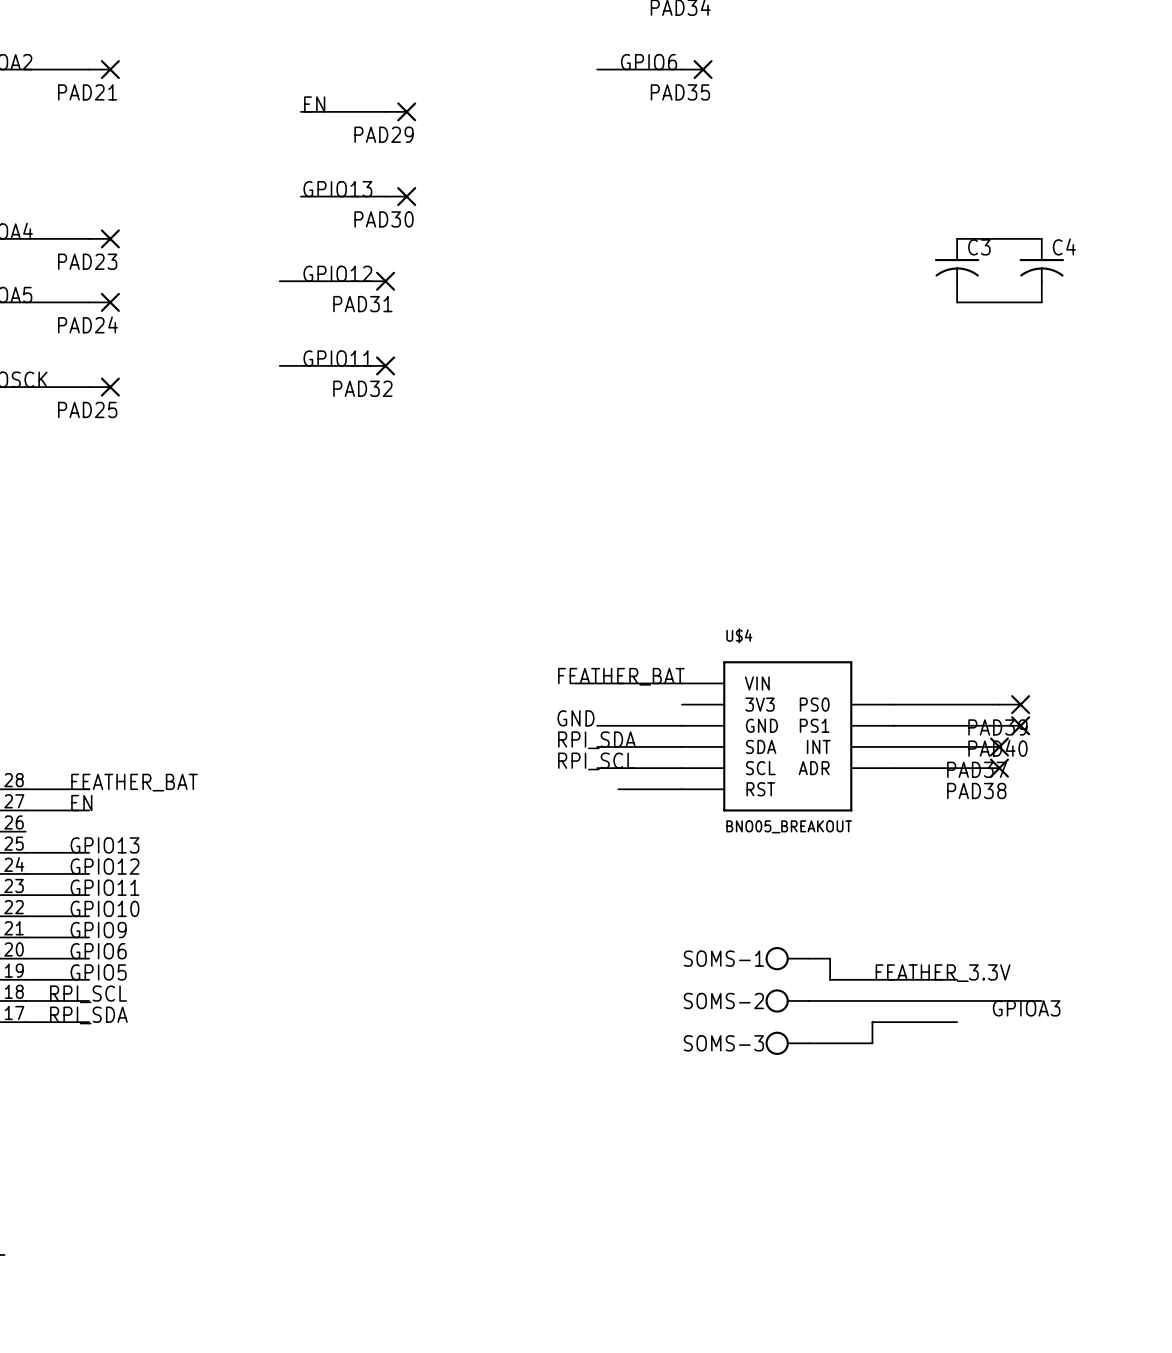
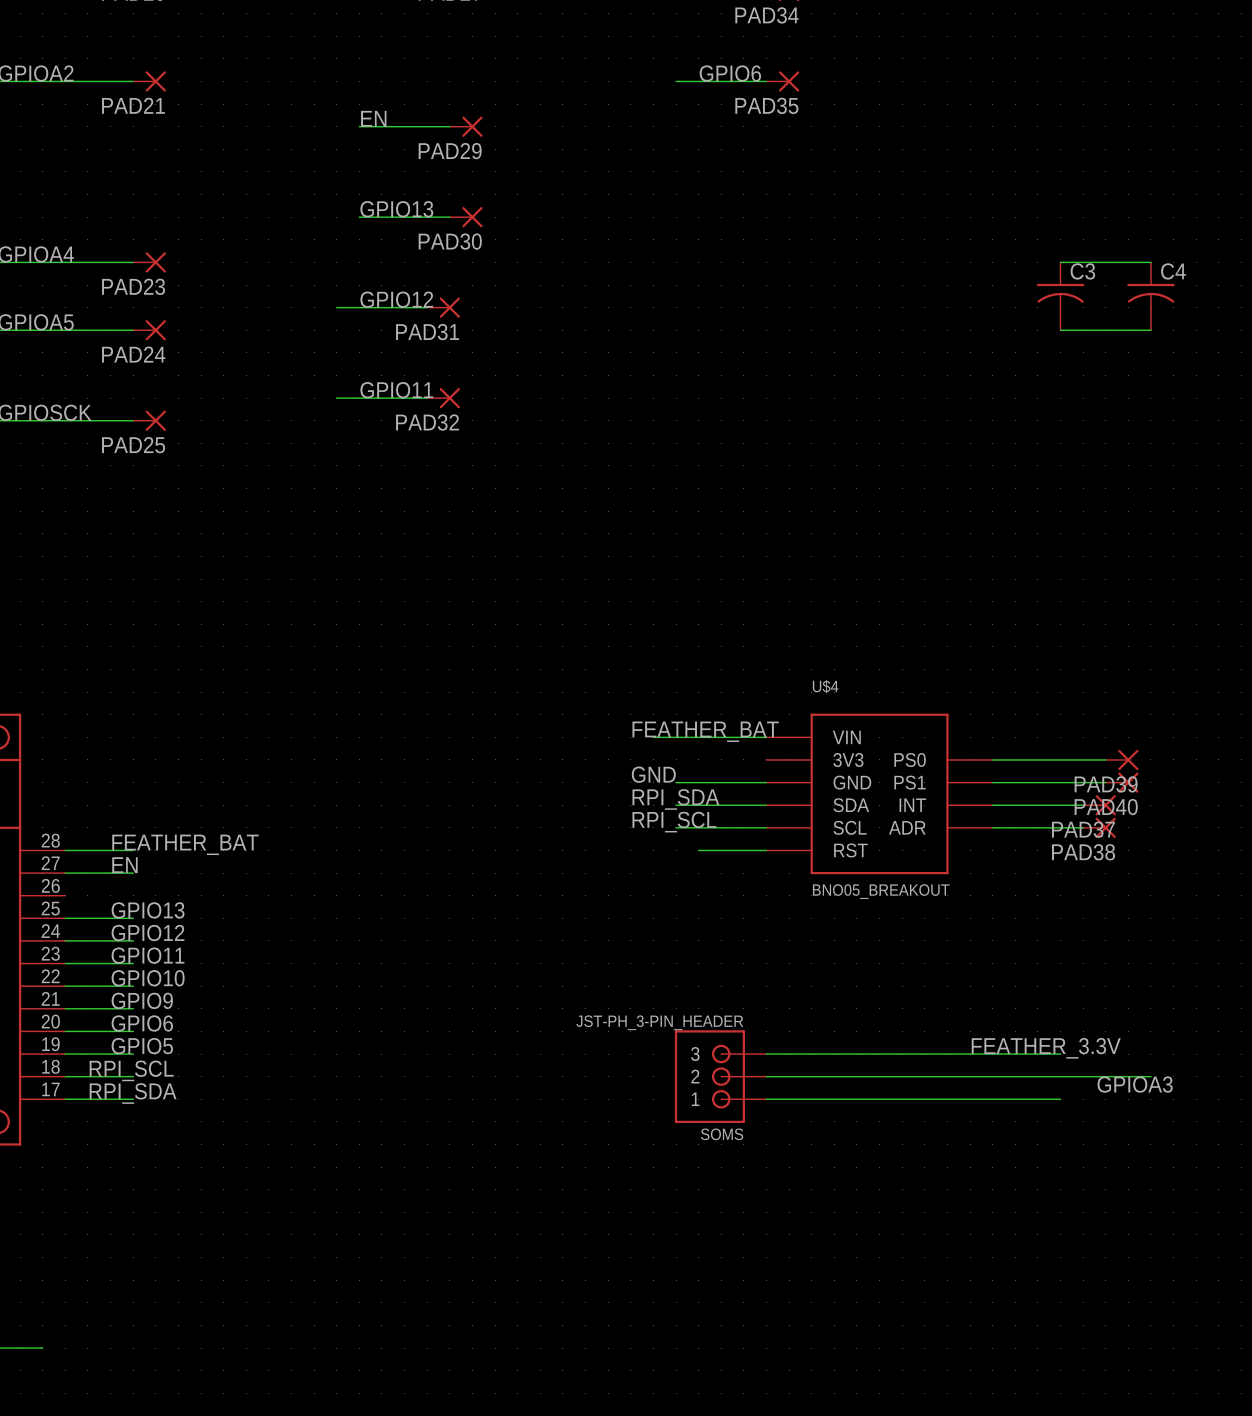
SOMS-1: (787, 958) -> none
wire: (808, 958) (830, 958) (830, 979) -> (766, 1054) (924, 1054)
SOMS: none -> JST-PH_3-PIN_HEADER (720, 1076)
wire: none -> (766, 1076) (902, 1076)
SOMS-2: (787, 1000) -> none
wire: (872, 1022) (872, 1043) (808, 1043) -> (970, 1099) (766, 1099)
SOMS-3: (787, 1043) -> none

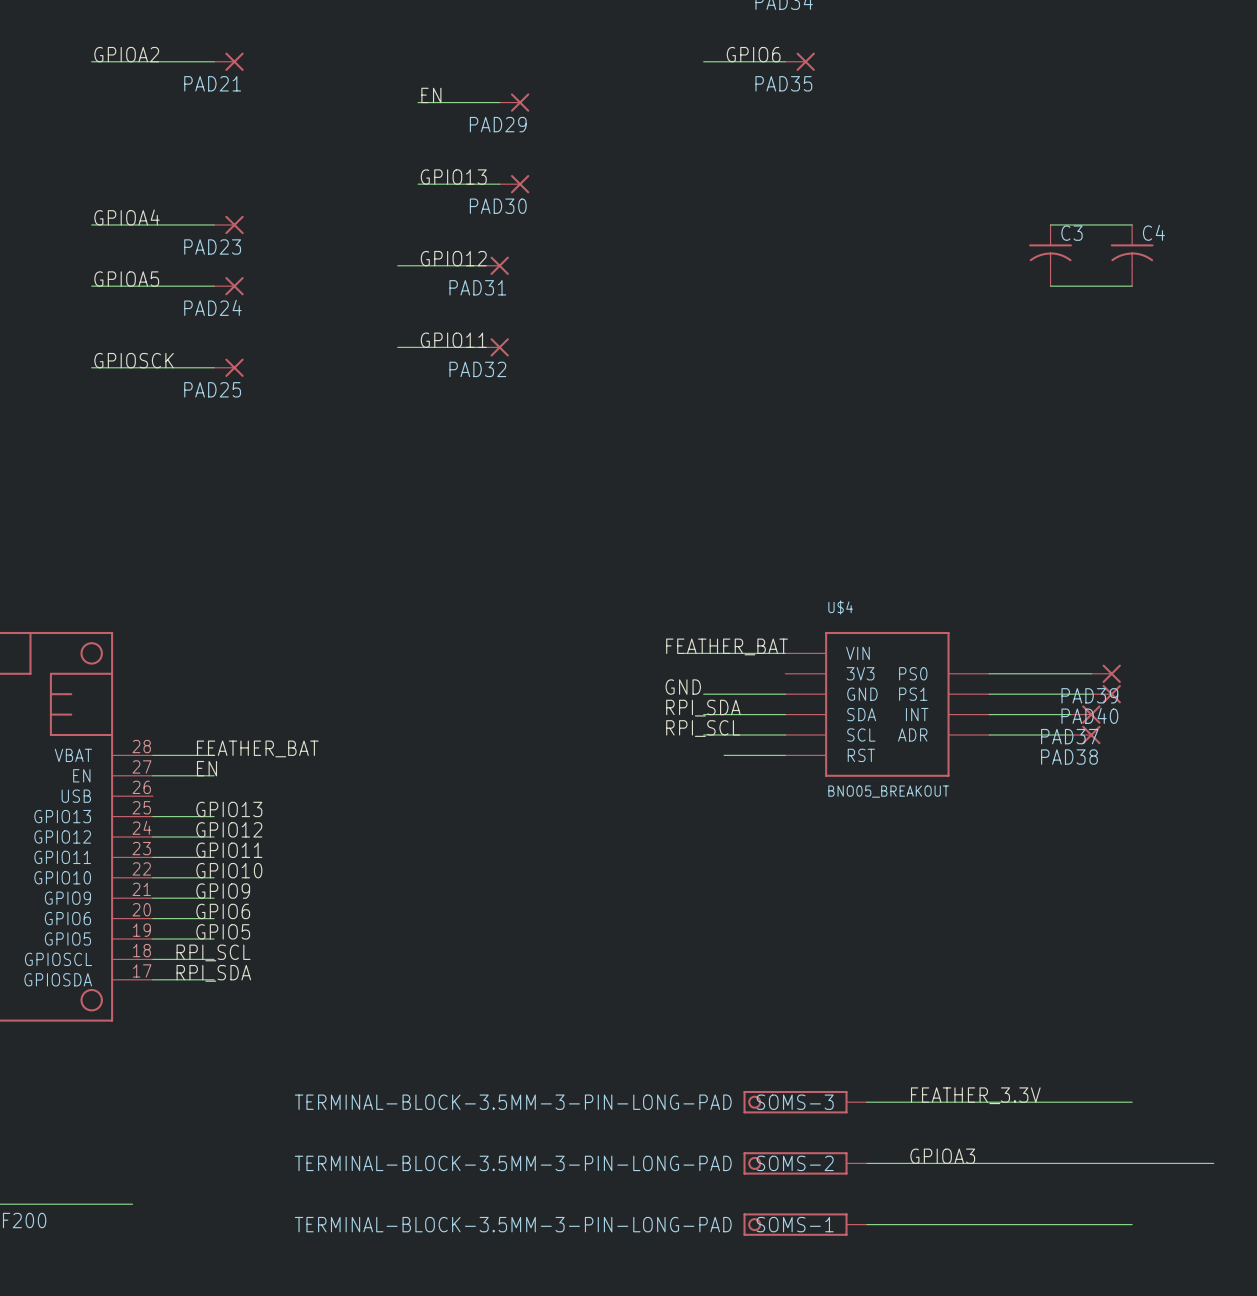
label position: FEATHER_3.3V (1046, 1048) -> FEATHER_3.3V (975, 1095)
wire: (766, 1054) (1060, 1054) -> none
SOMS: JST-PH_3-PIN_HEADER (720, 1076) -> none
wire: (766, 1076) (1150, 1076) -> none
label: GPIOA3 (1135, 1084) -> none
wire: (766, 1099) (1060, 1099) -> (866, 1102) (1132, 1102)
SOMS-3: none -> TERMINAL-BLOCK-3.5MM-3-PIN-LONG-PAD (805, 1102)
label: none -> GPIOA3 (942, 1156)
SOMS-2: none -> TERMINAL-BLOCK-3.5MM-3-PIN-LONG-PAD (805, 1163)
wire: none -> (866, 1163) (1213, 1163)
SOMS-1: none -> TERMINAL-BLOCK-3.5MM-3-PIN-LONG-PAD (805, 1224)
wire: none -> (866, 1224) (1132, 1224)

